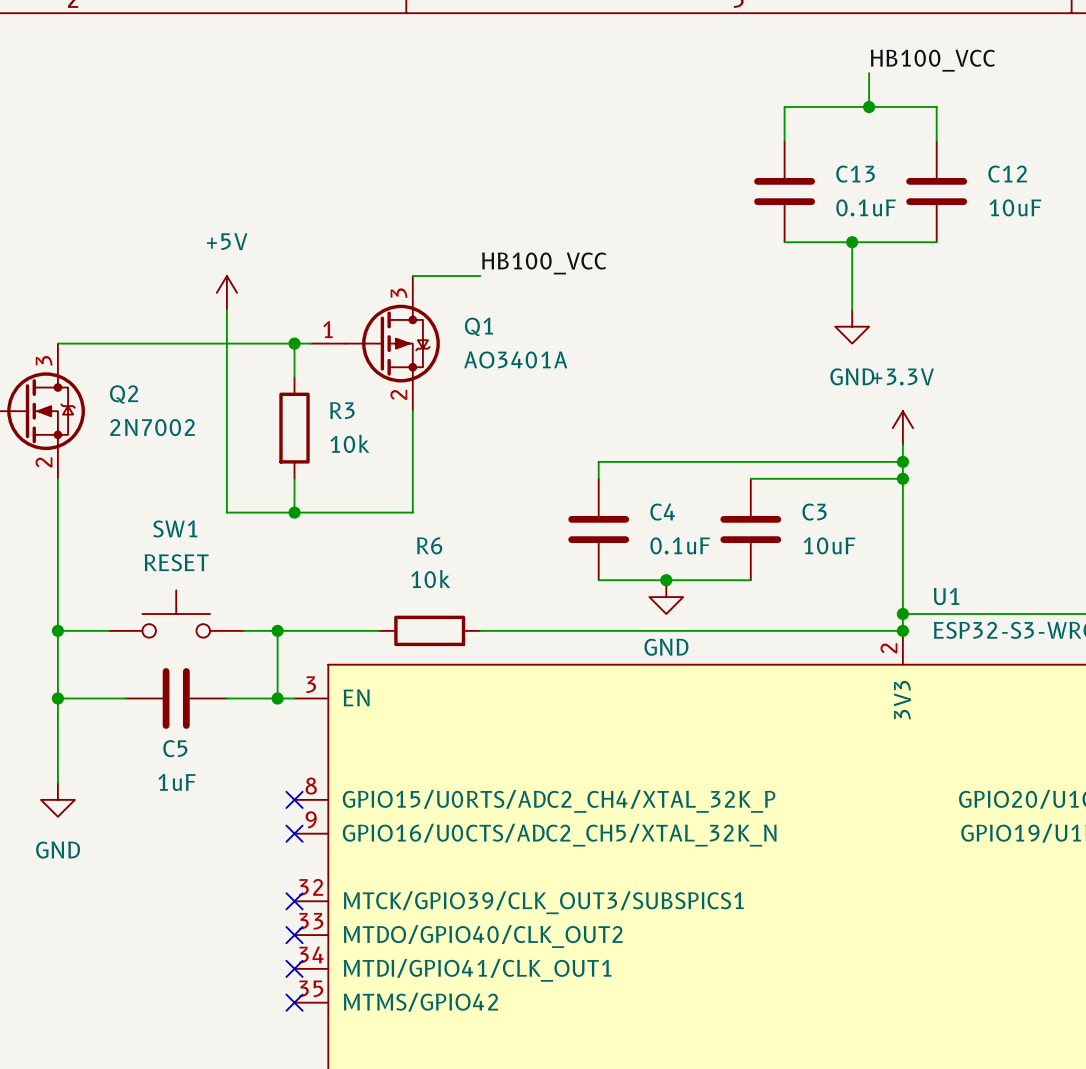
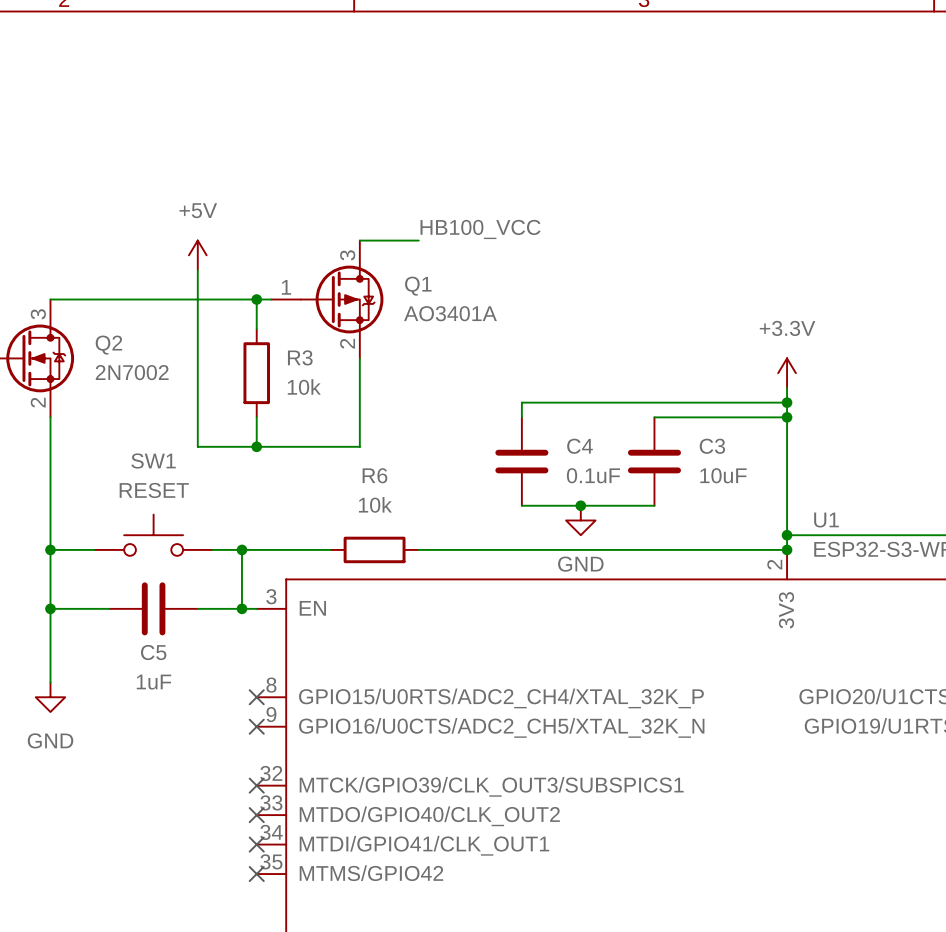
label: HB100_VCC (932, 60) -> none
wire: (869, 73) (869, 107) -> none
junction: (869, 107) -> none
wire: (784, 140) (784, 107) (936, 107) (936, 140) -> none
C13: 0.1uF (784, 191) -> none
C12: 10uF (936, 191) -> none
wire: (784, 242) (936, 242) -> none
wire: (852, 242) (852, 309) -> none
junction: (852, 242) -> none
power symbol: GND (852, 326) -> none

